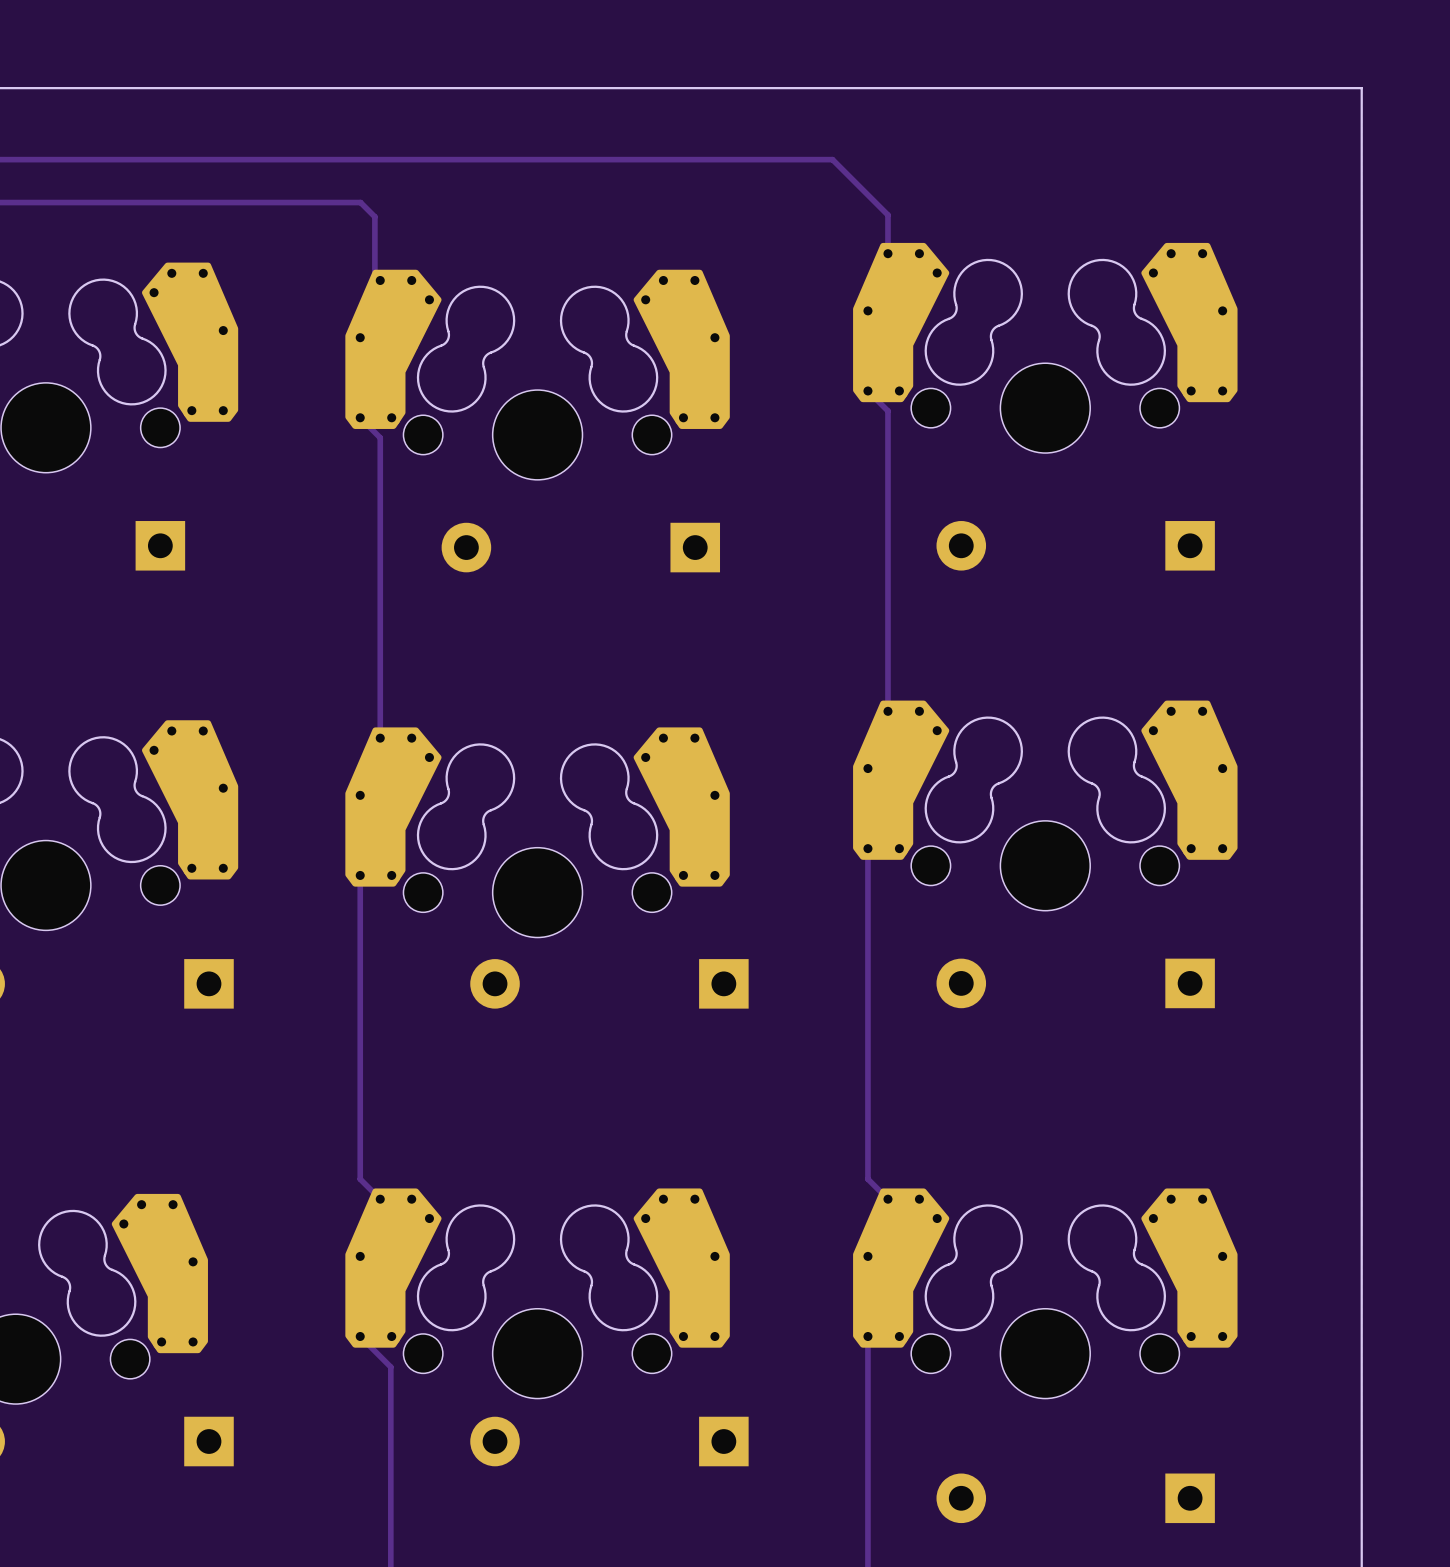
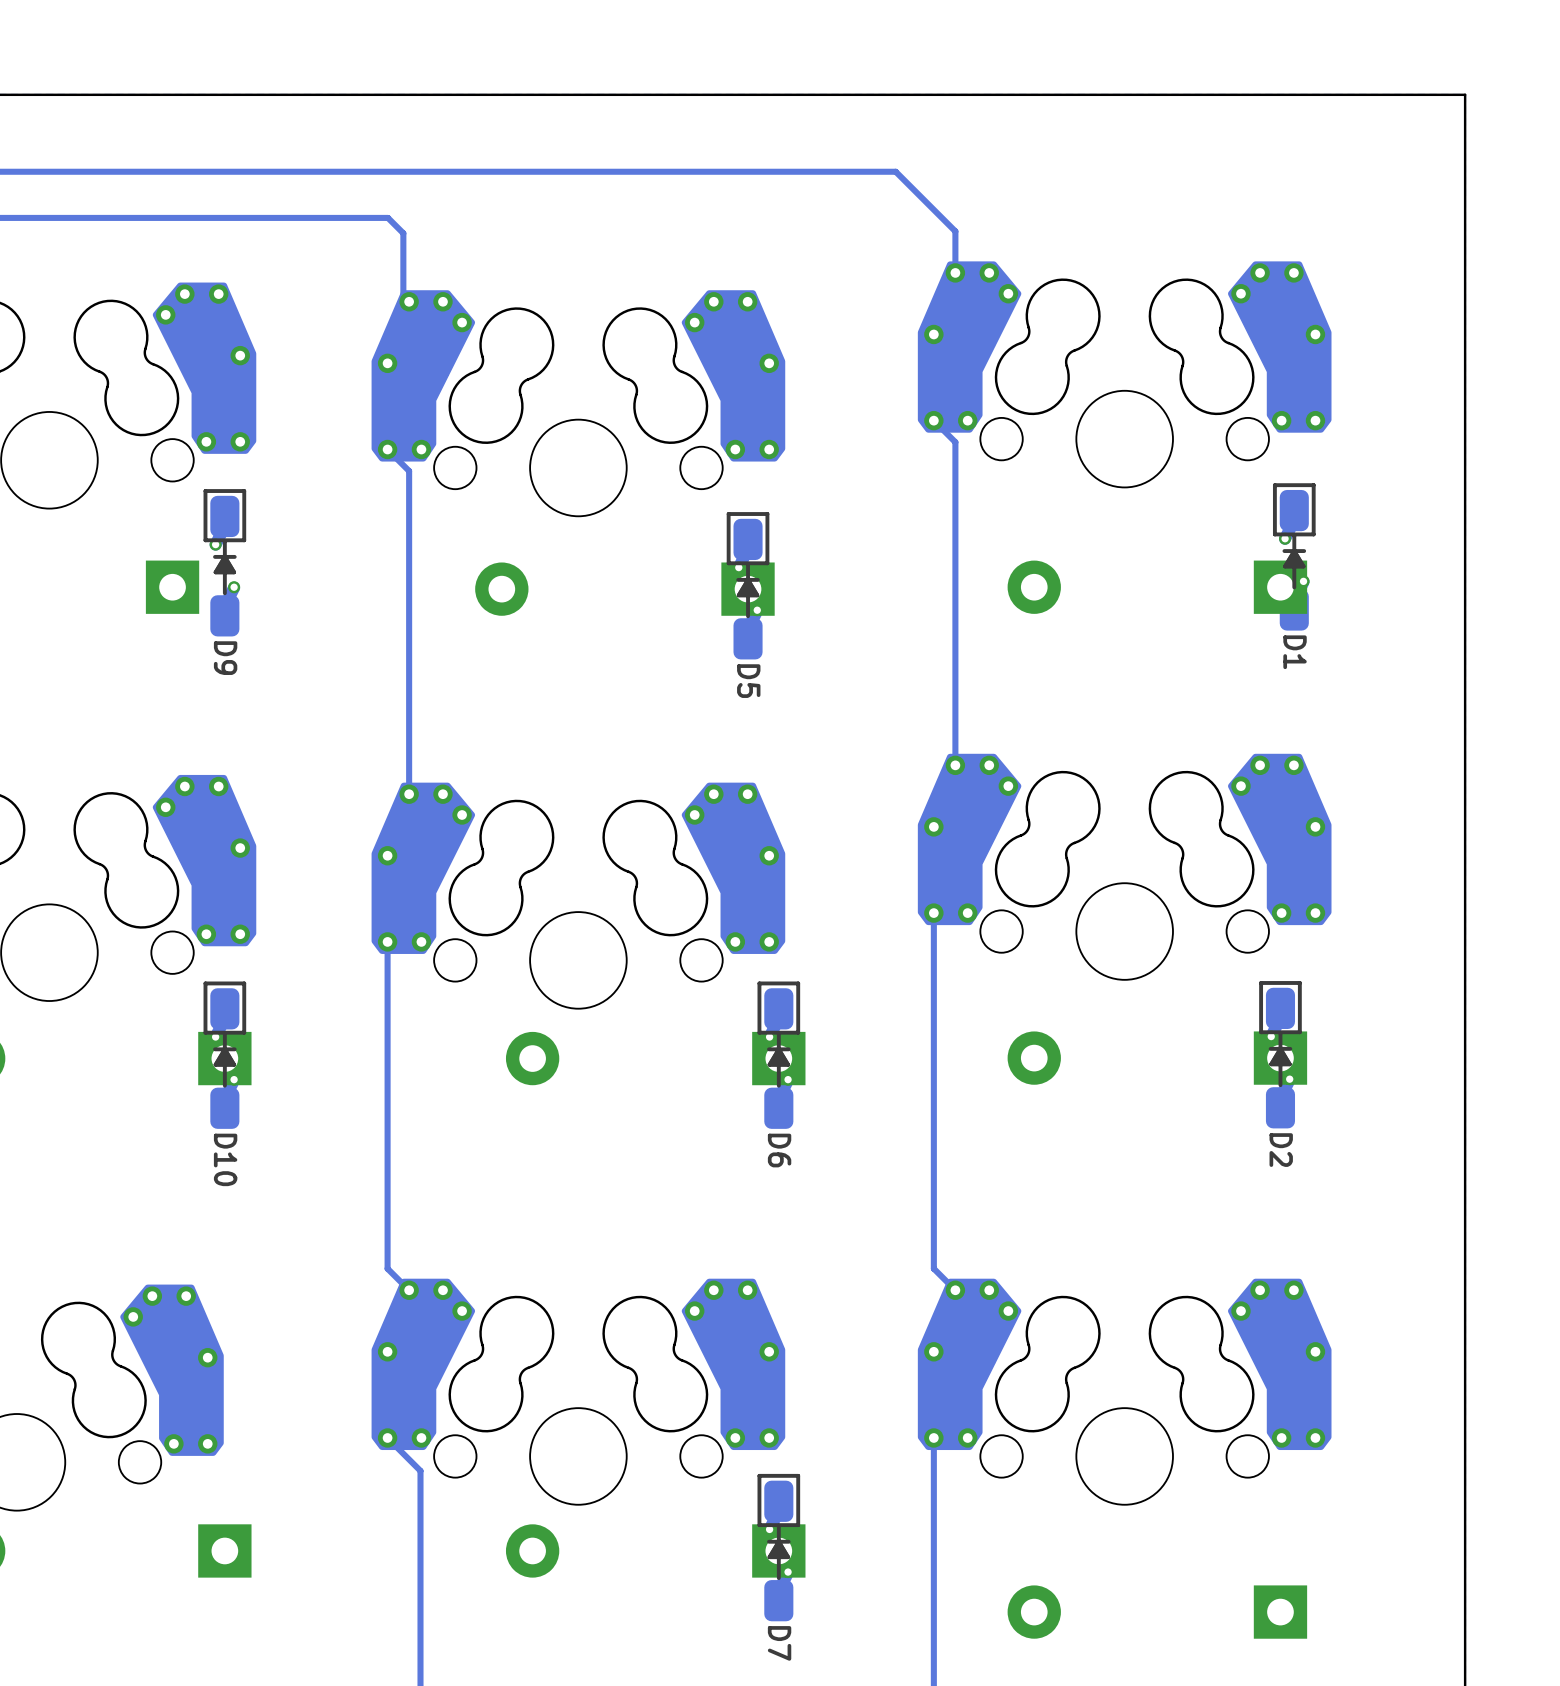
D1: none -> (1294, 556)
D9: none -> (224, 562)
D5: none -> (748, 585)
D10: none -> (224, 1055)
D6: none -> (778, 1055)
D2: none -> (1280, 1054)
D7: none -> (778, 1547)

